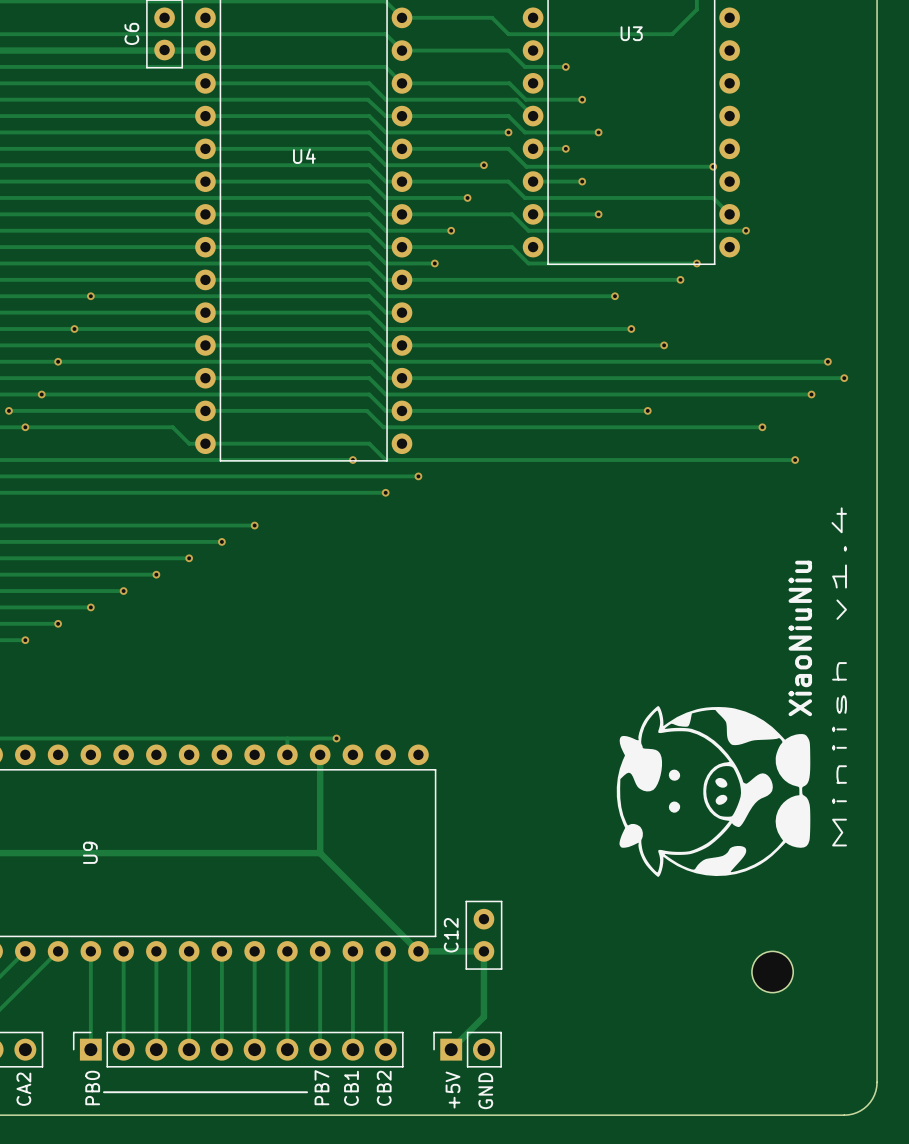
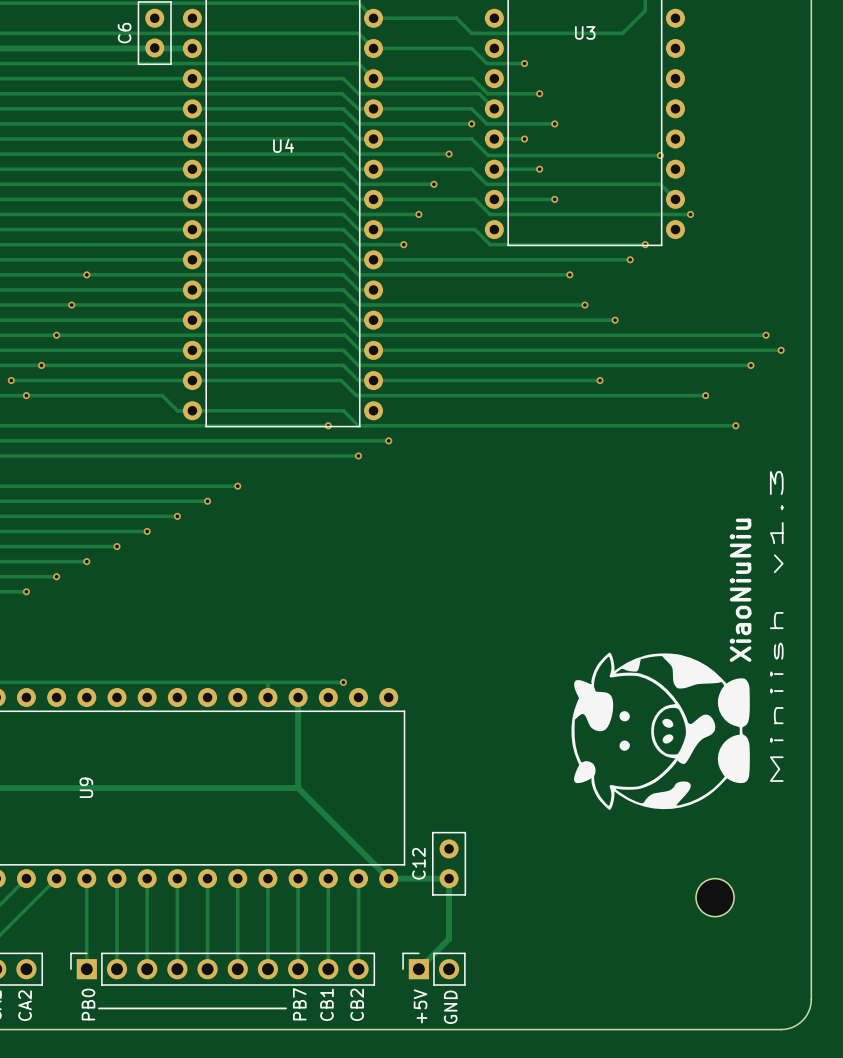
text: Miniish v1.4 (839, 676) -> Miniish v1.3 (776, 626)
track: none -> (313, 682) (343, 682)
via position: (336, 738) -> (343, 682)

